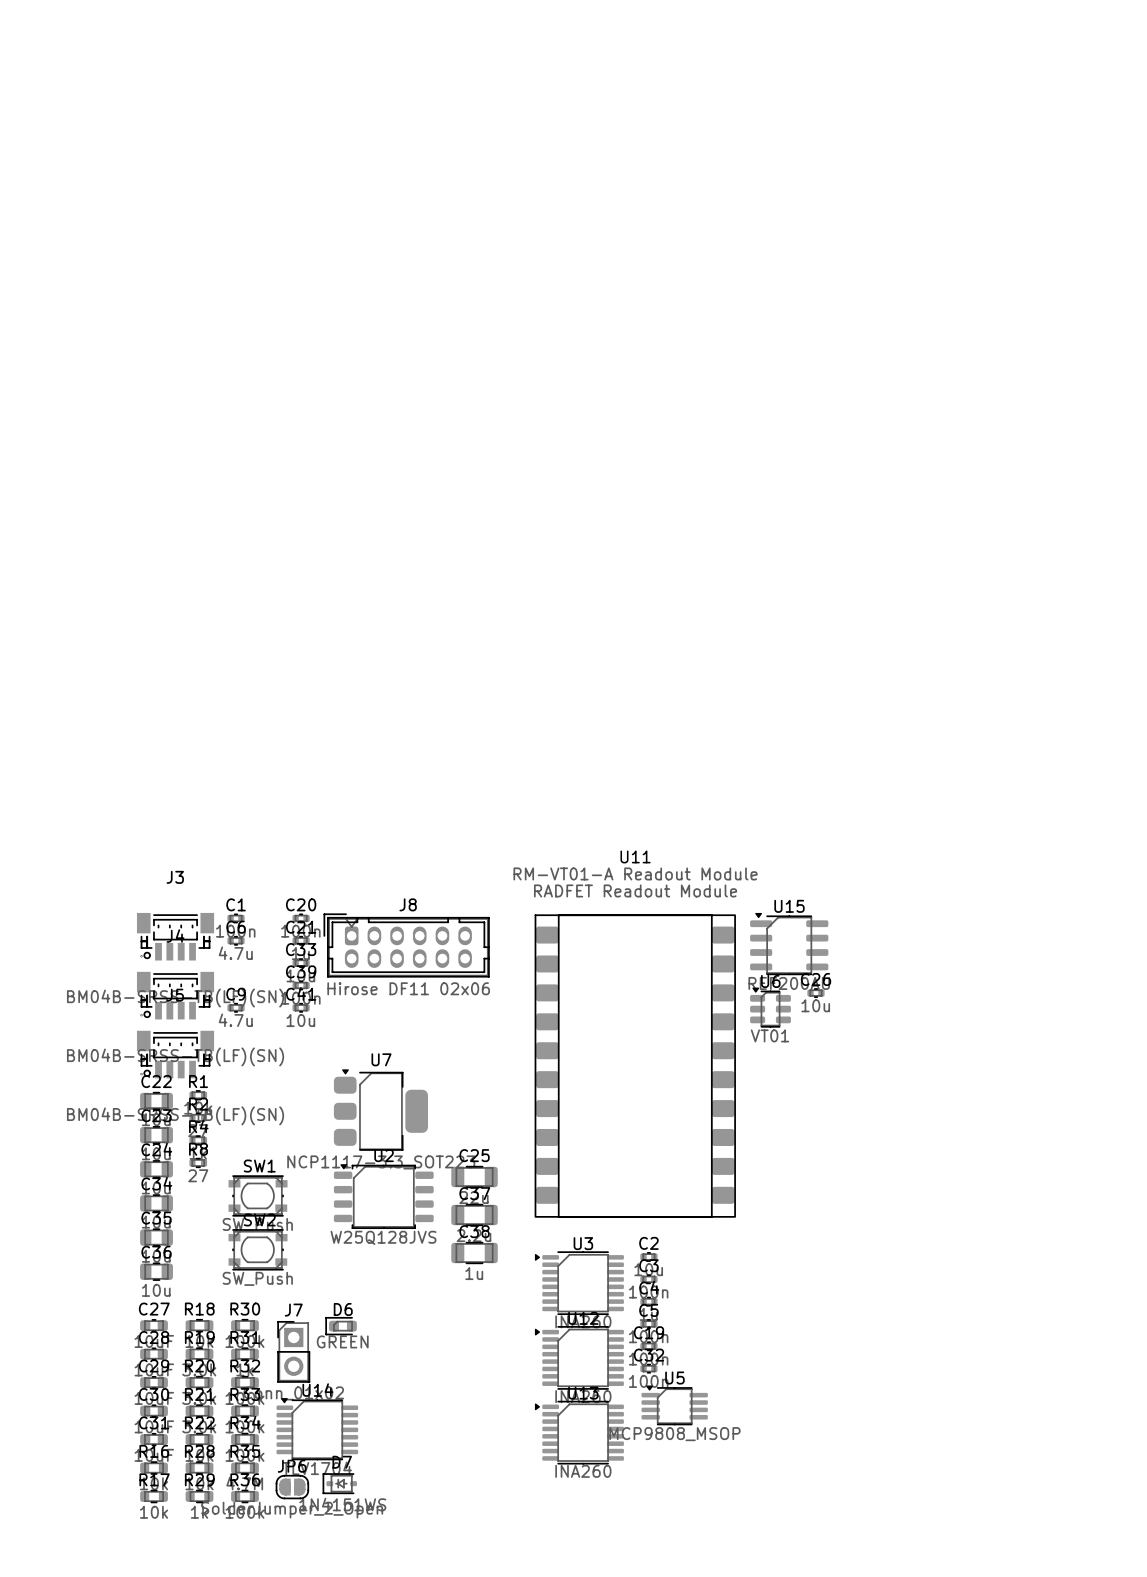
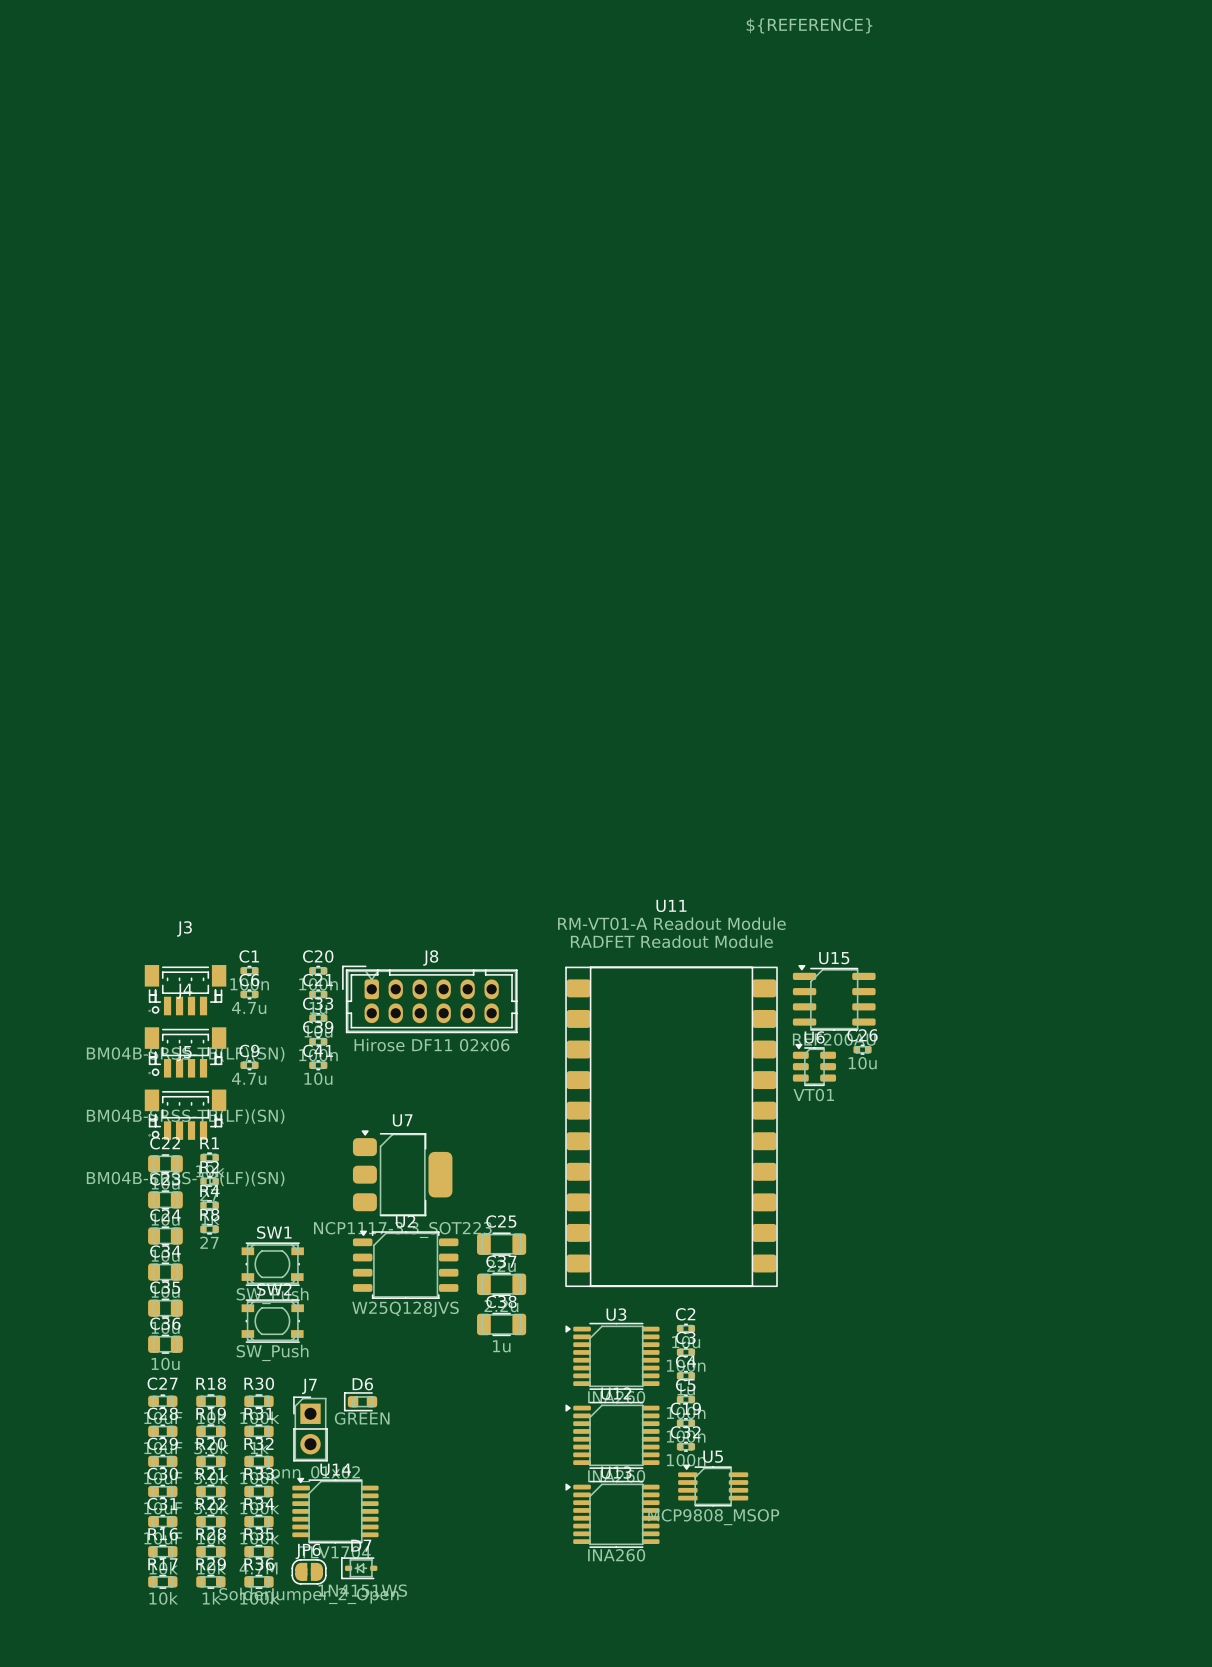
text: none -> ${REFERENCE} (809, 25)

